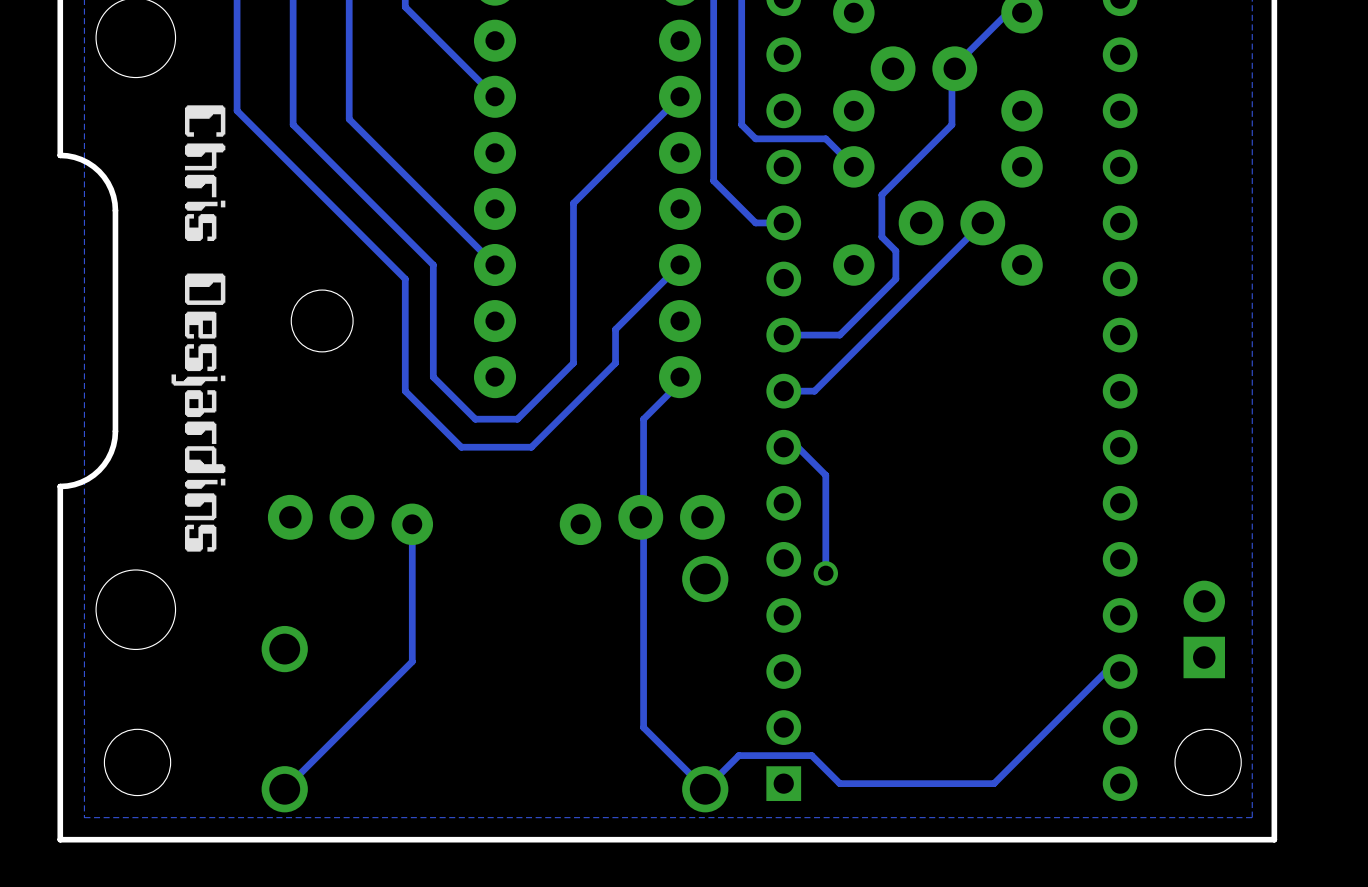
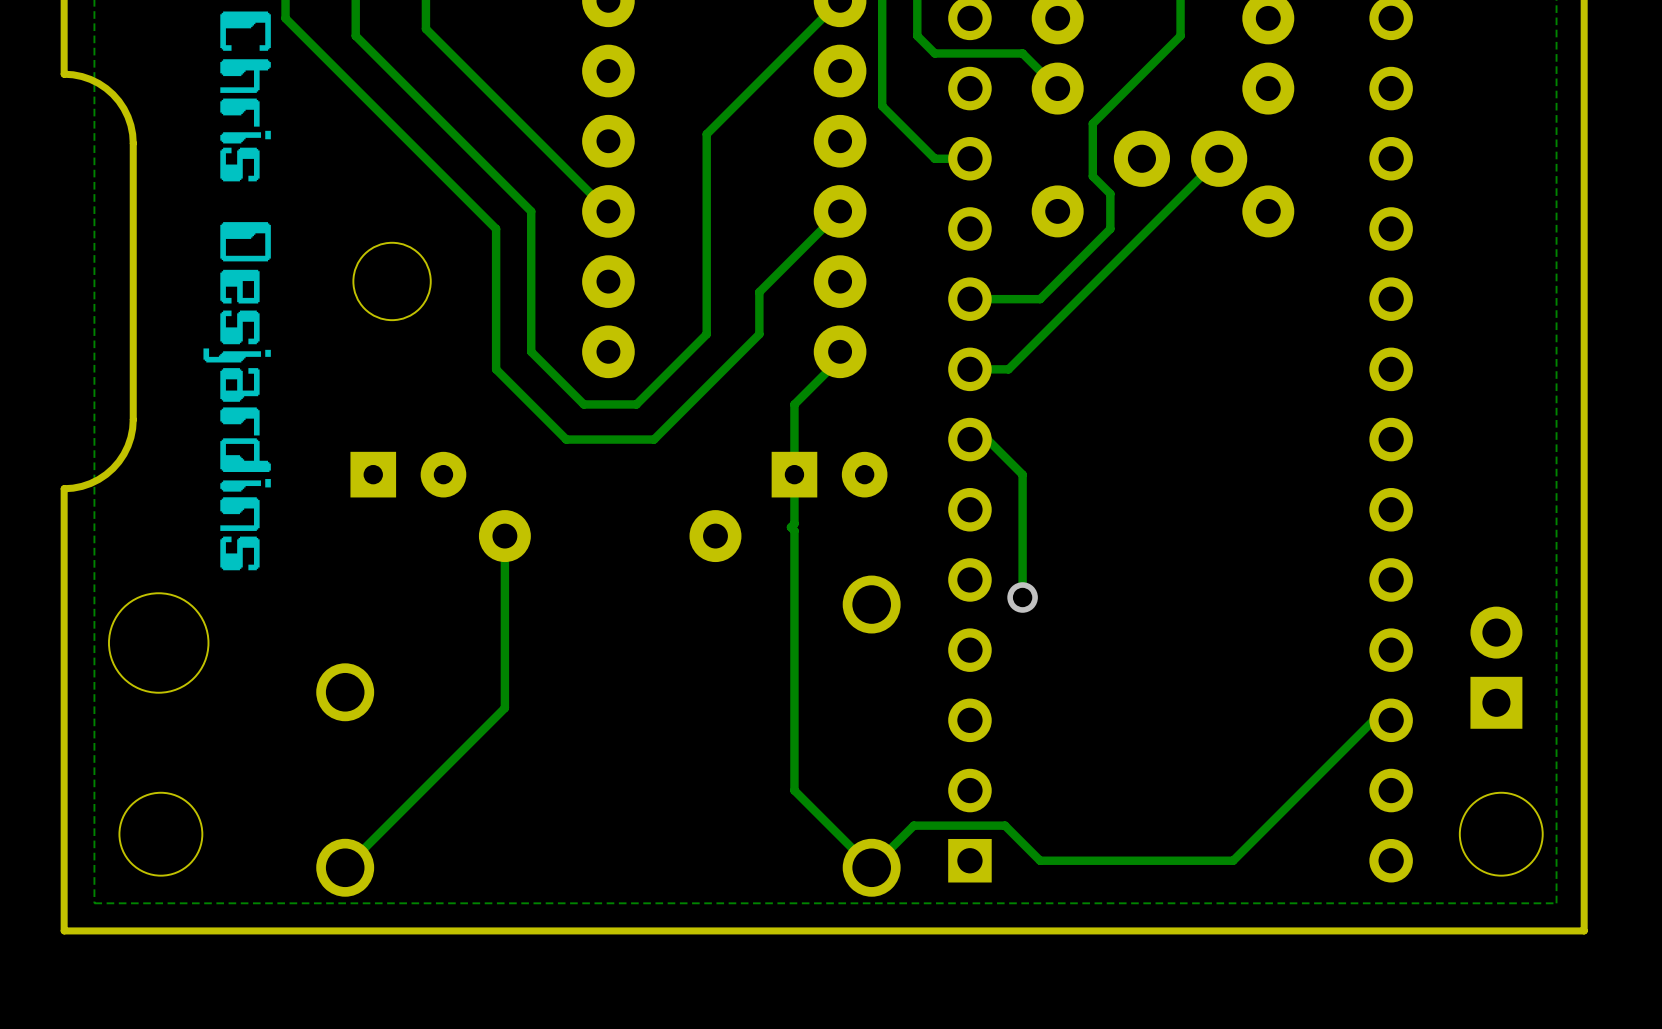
part: none -> (408, 474)
part: none -> (829, 474)
part: (321, 517) -> none
part: (671, 517) -> none

